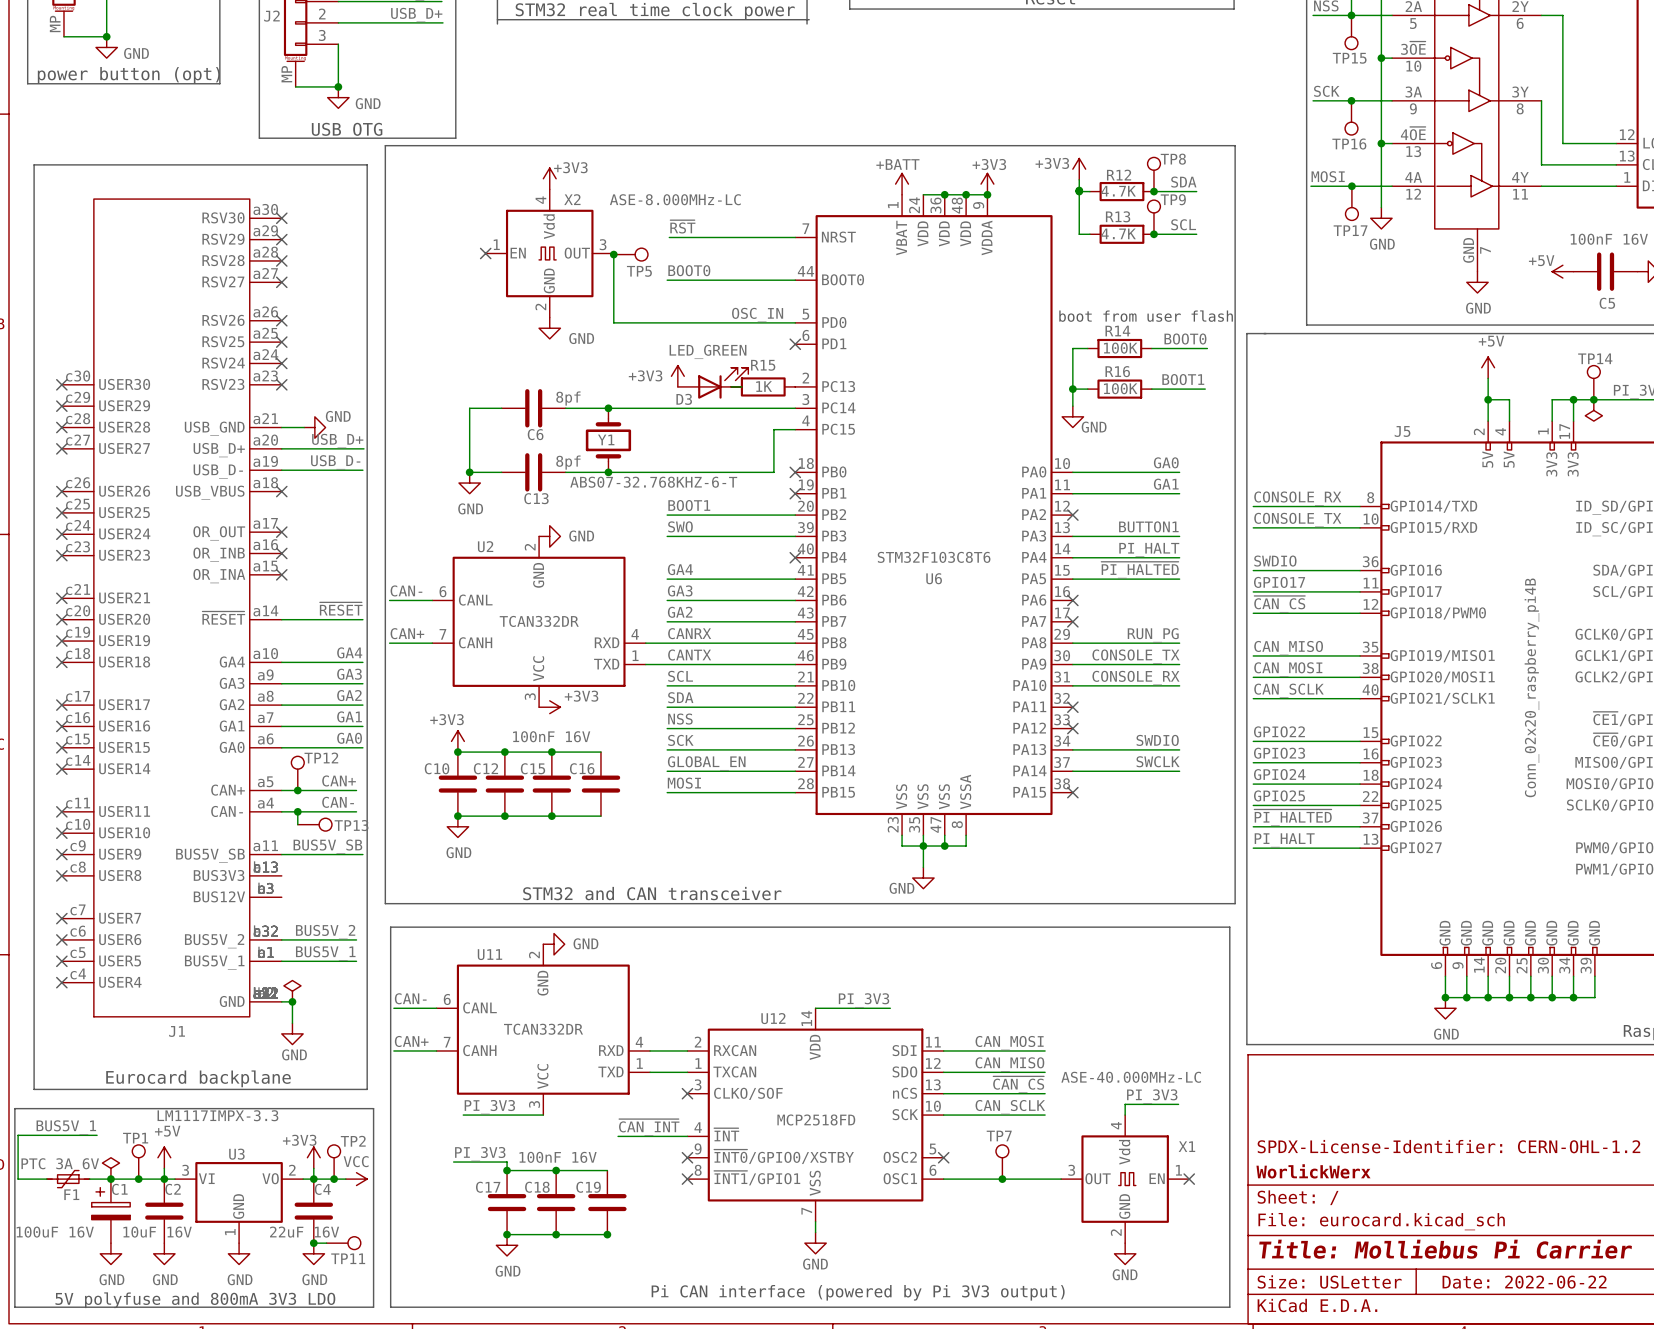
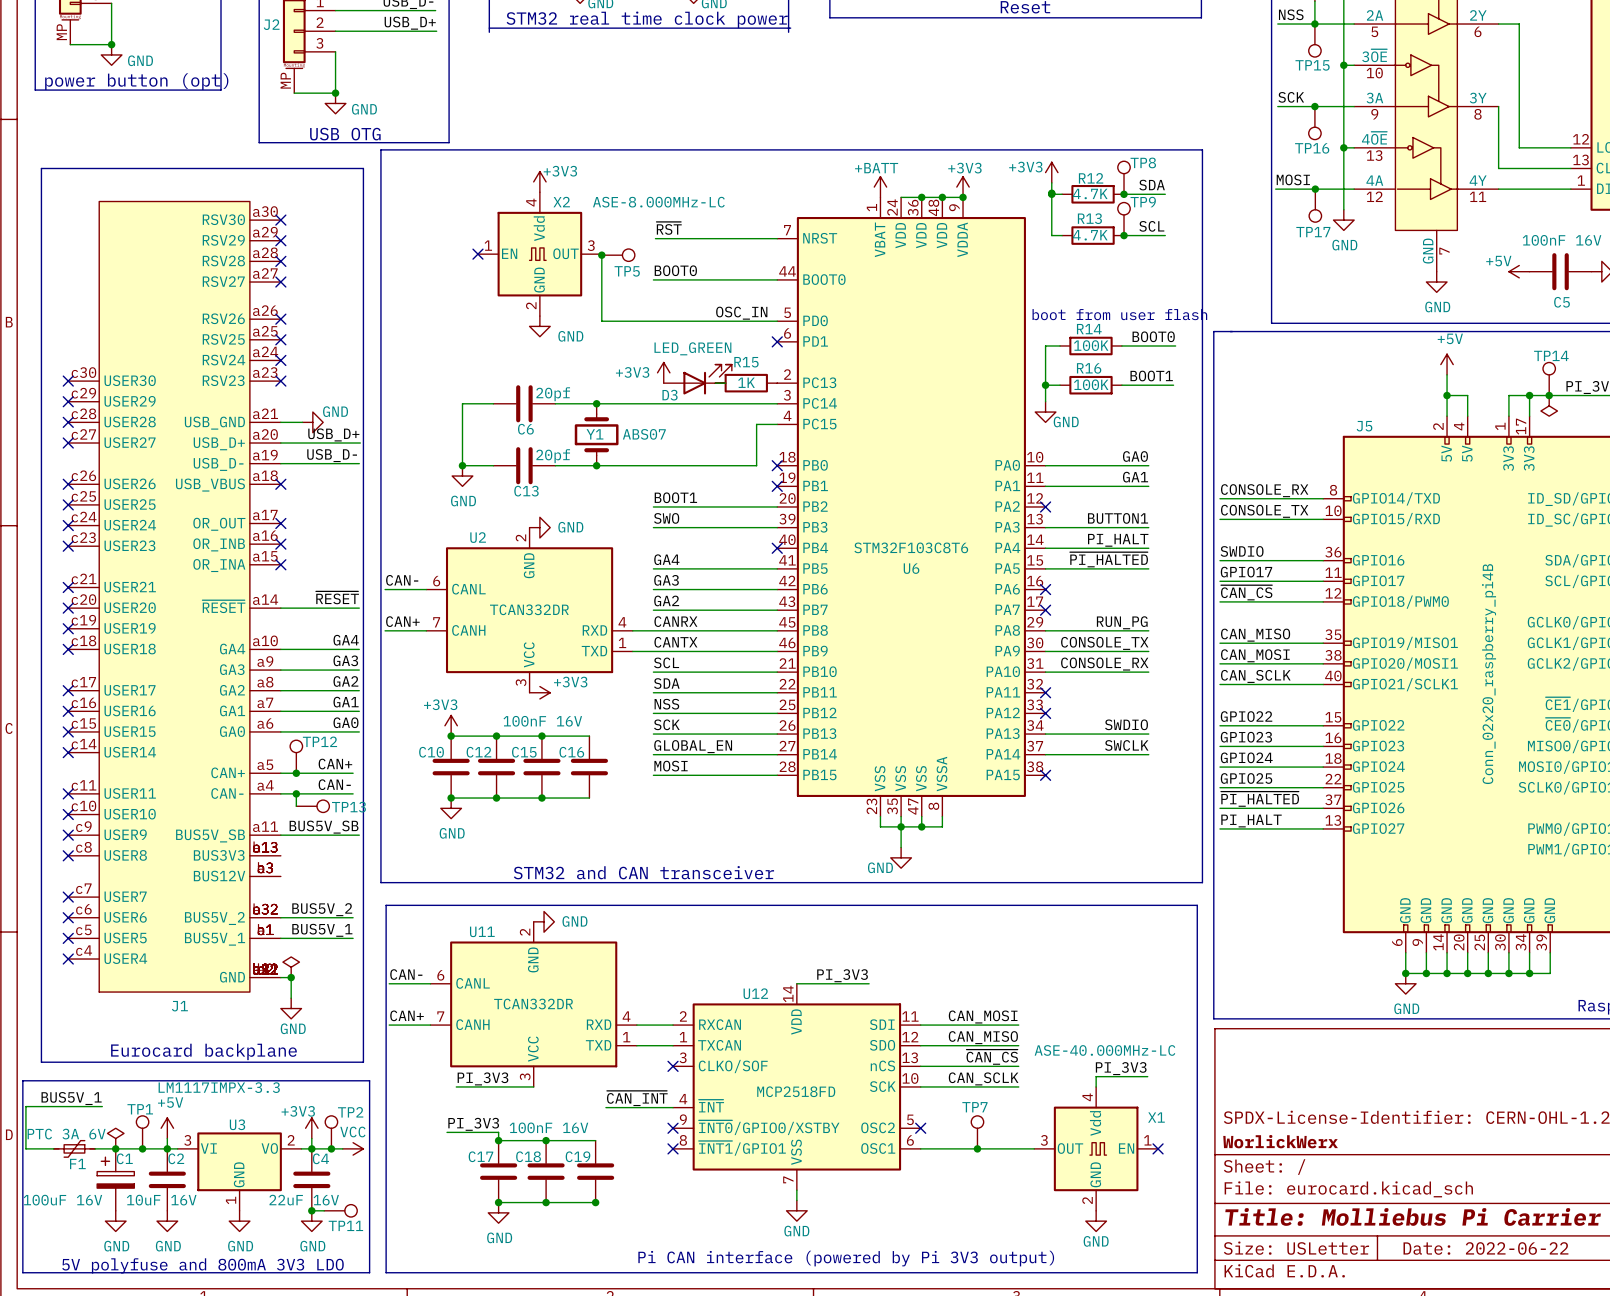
C6 value: 8pf (568, 398) -> 20pf (553, 394)
C13 value: 8pf (568, 462) -> 20pf (553, 456)
Y1 value: ABS07-32.768KHZ-6-T (653, 482) -> ABS07 (644, 434)

